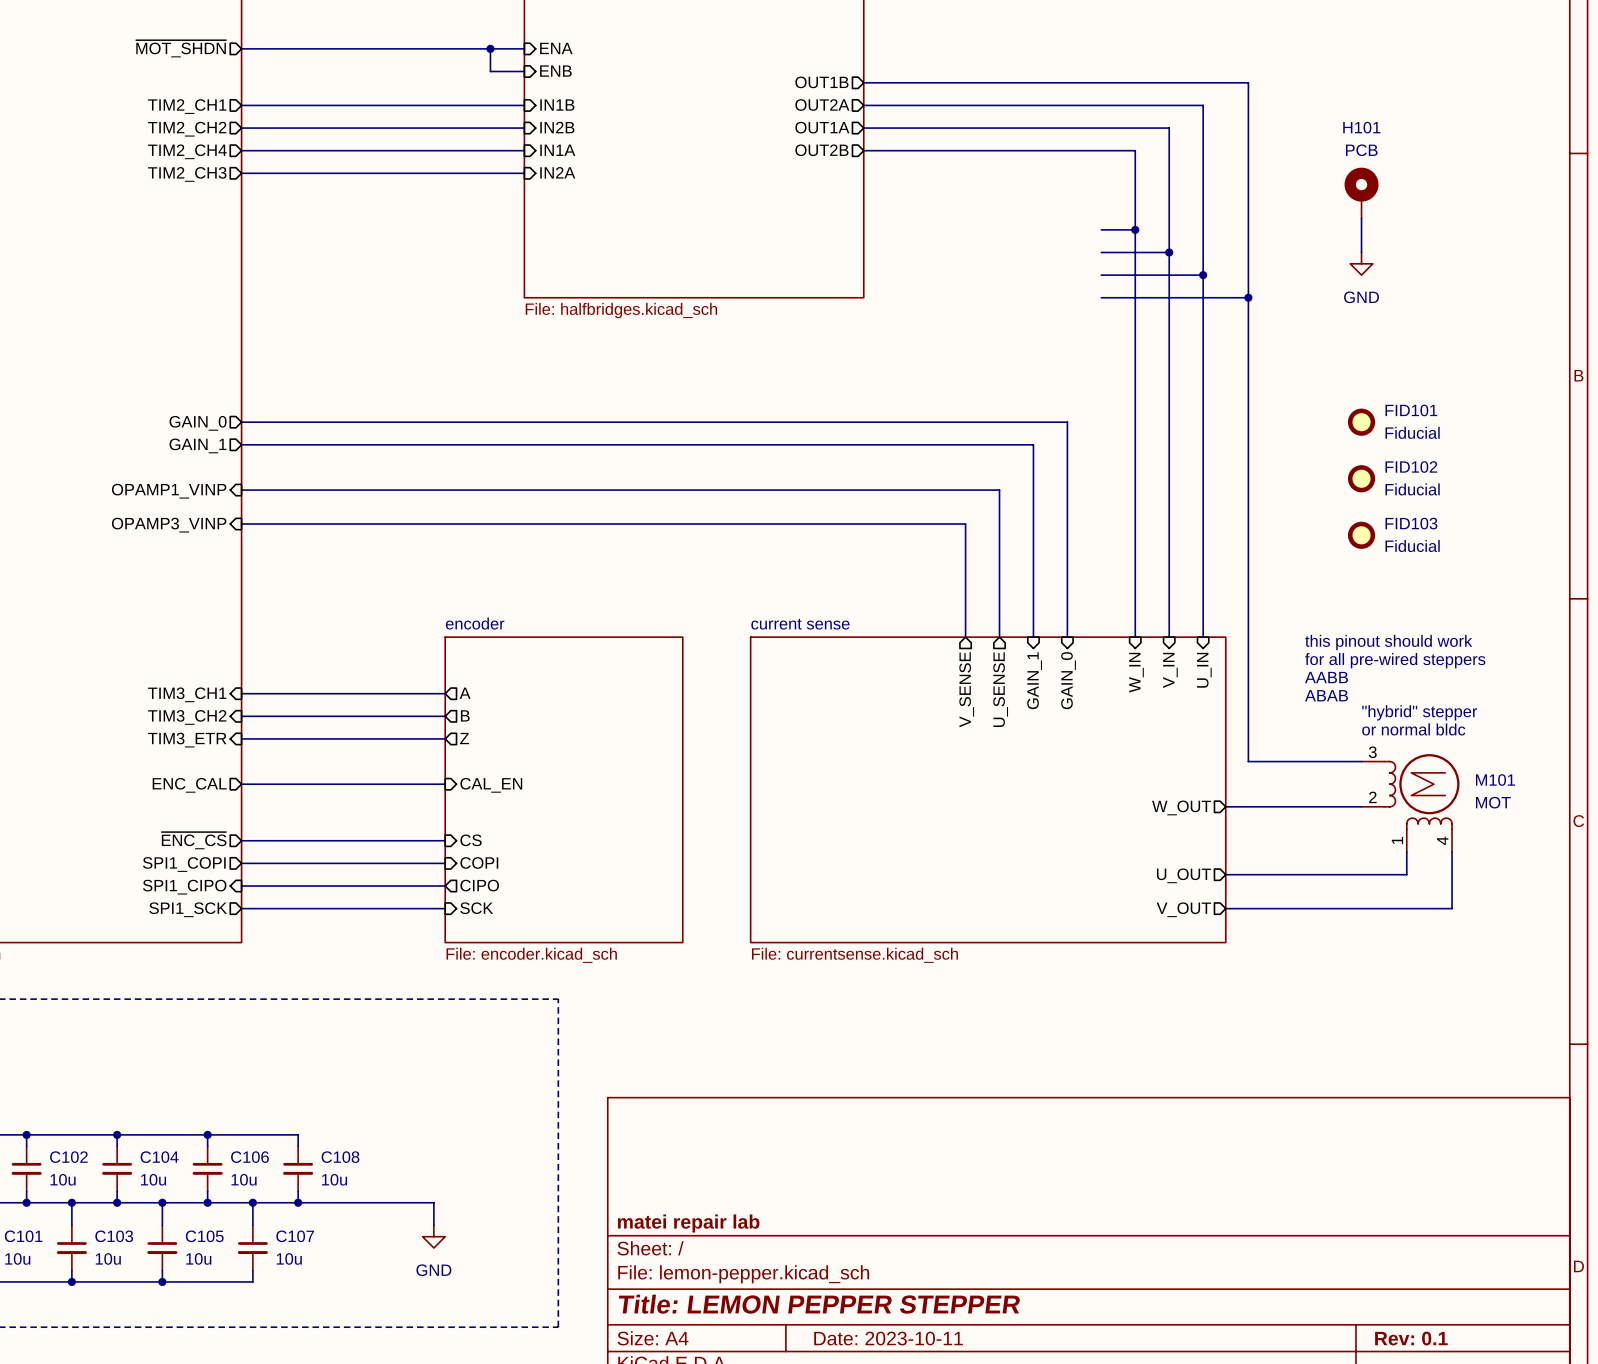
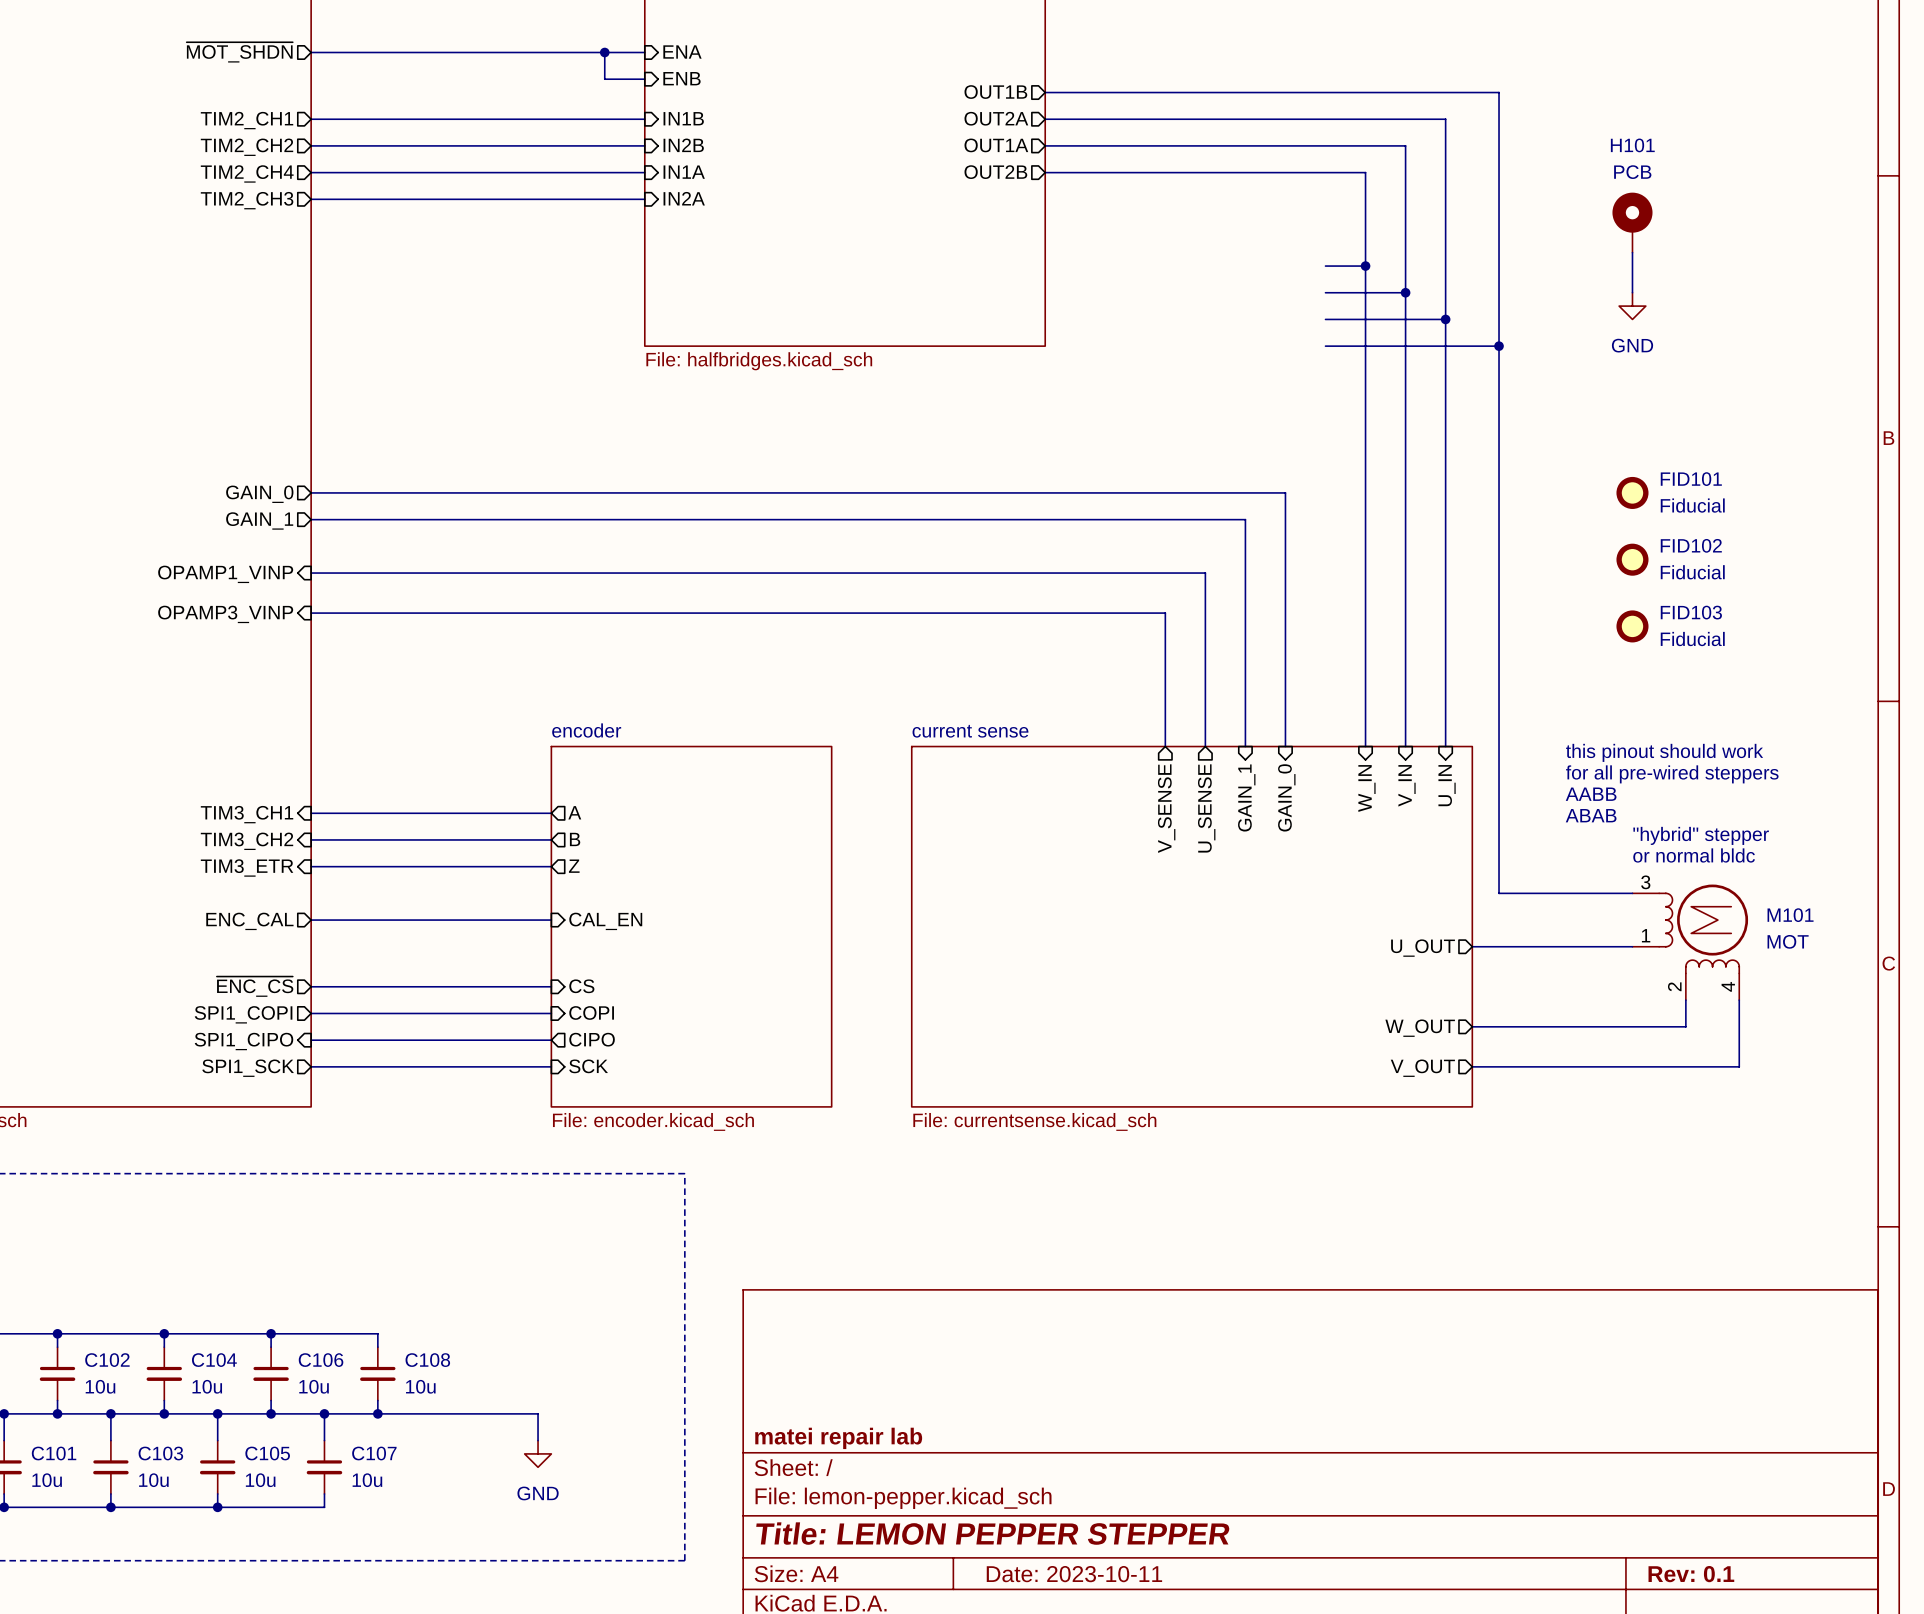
M101 pin number: 2 (1372, 797) -> 1 (1646, 935)
sheet pin: W_OUT (1181, 807) -> U_OUT (1423, 948)
M101 pin number: 1 (1397, 840) -> 2 (1674, 986)
sheet pin: U_OUT (1183, 875) -> W_OUT (1420, 1028)

